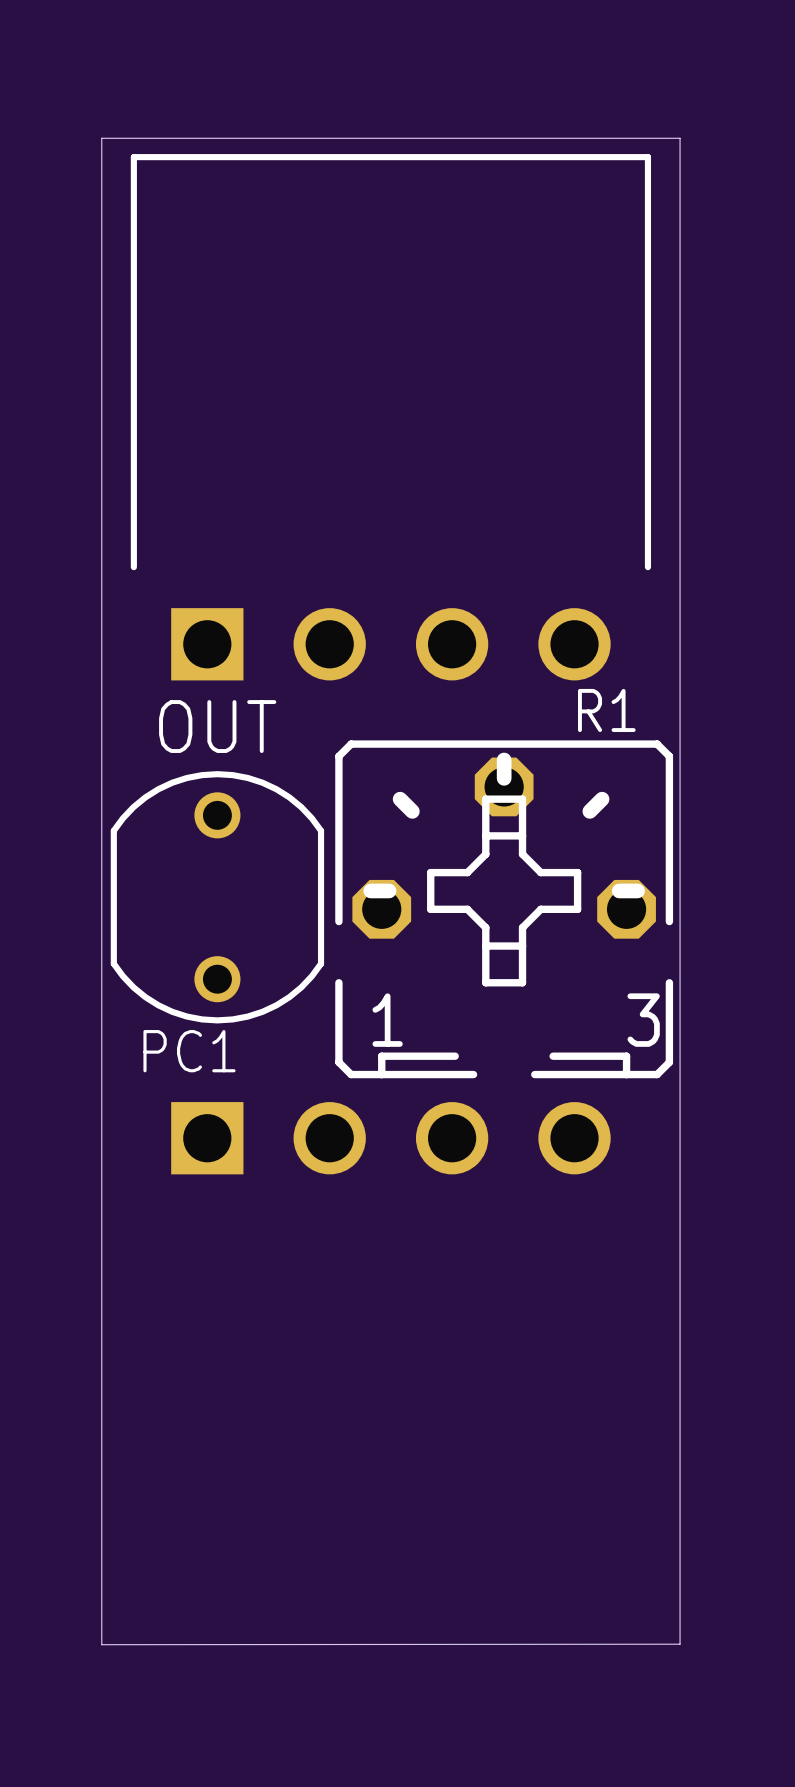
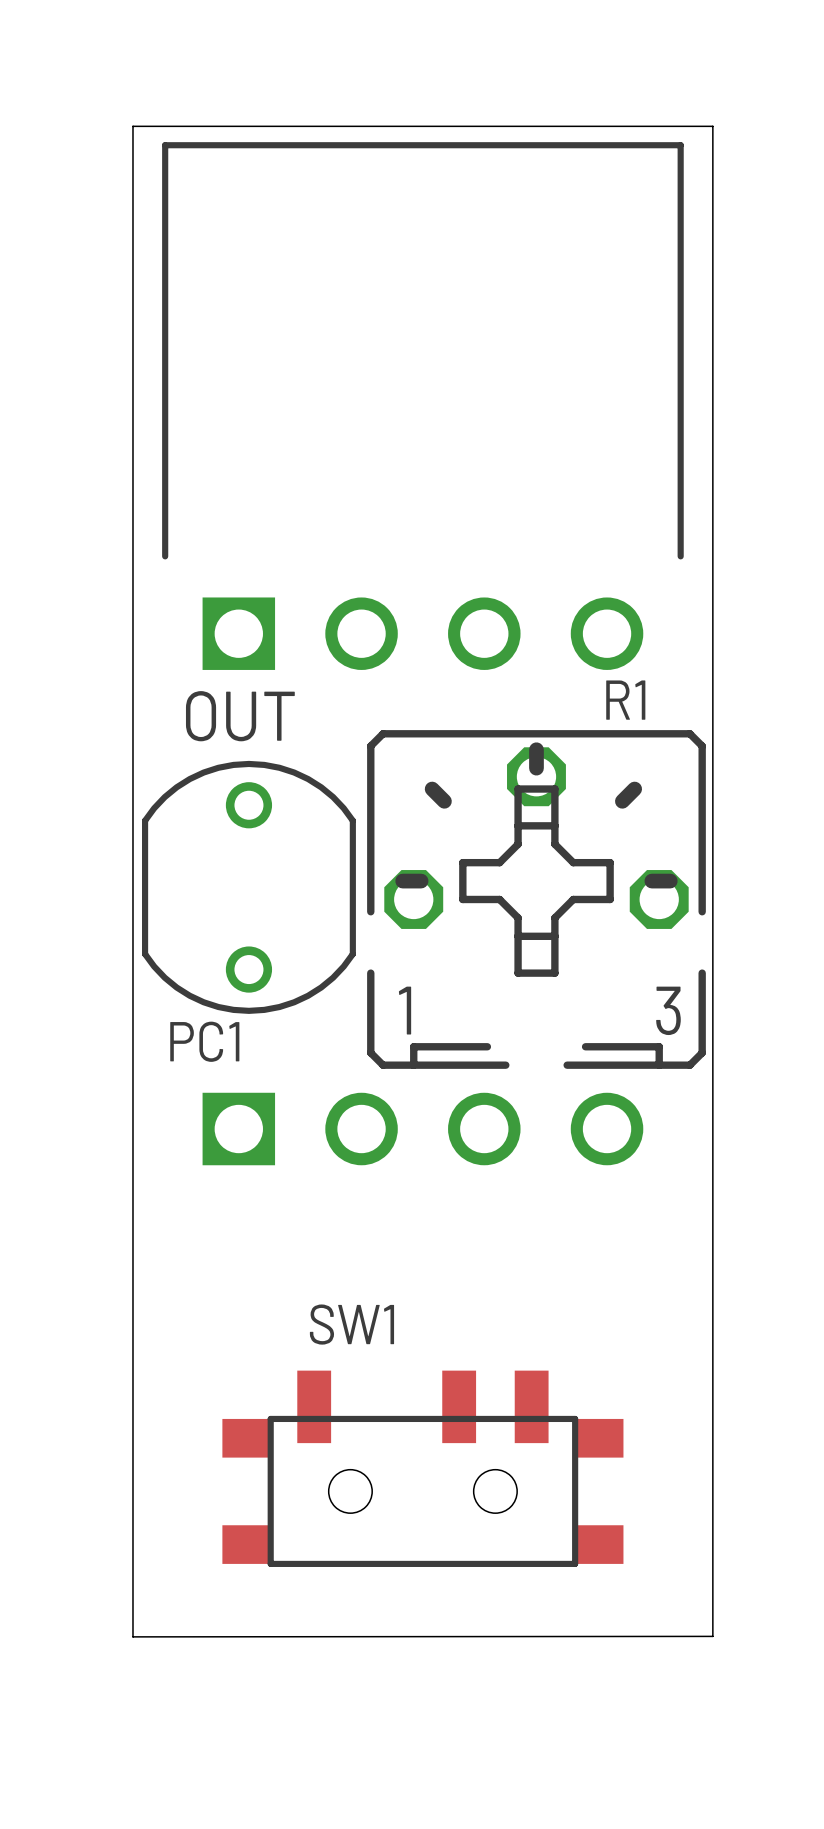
SW1: none -> (422, 1468)

